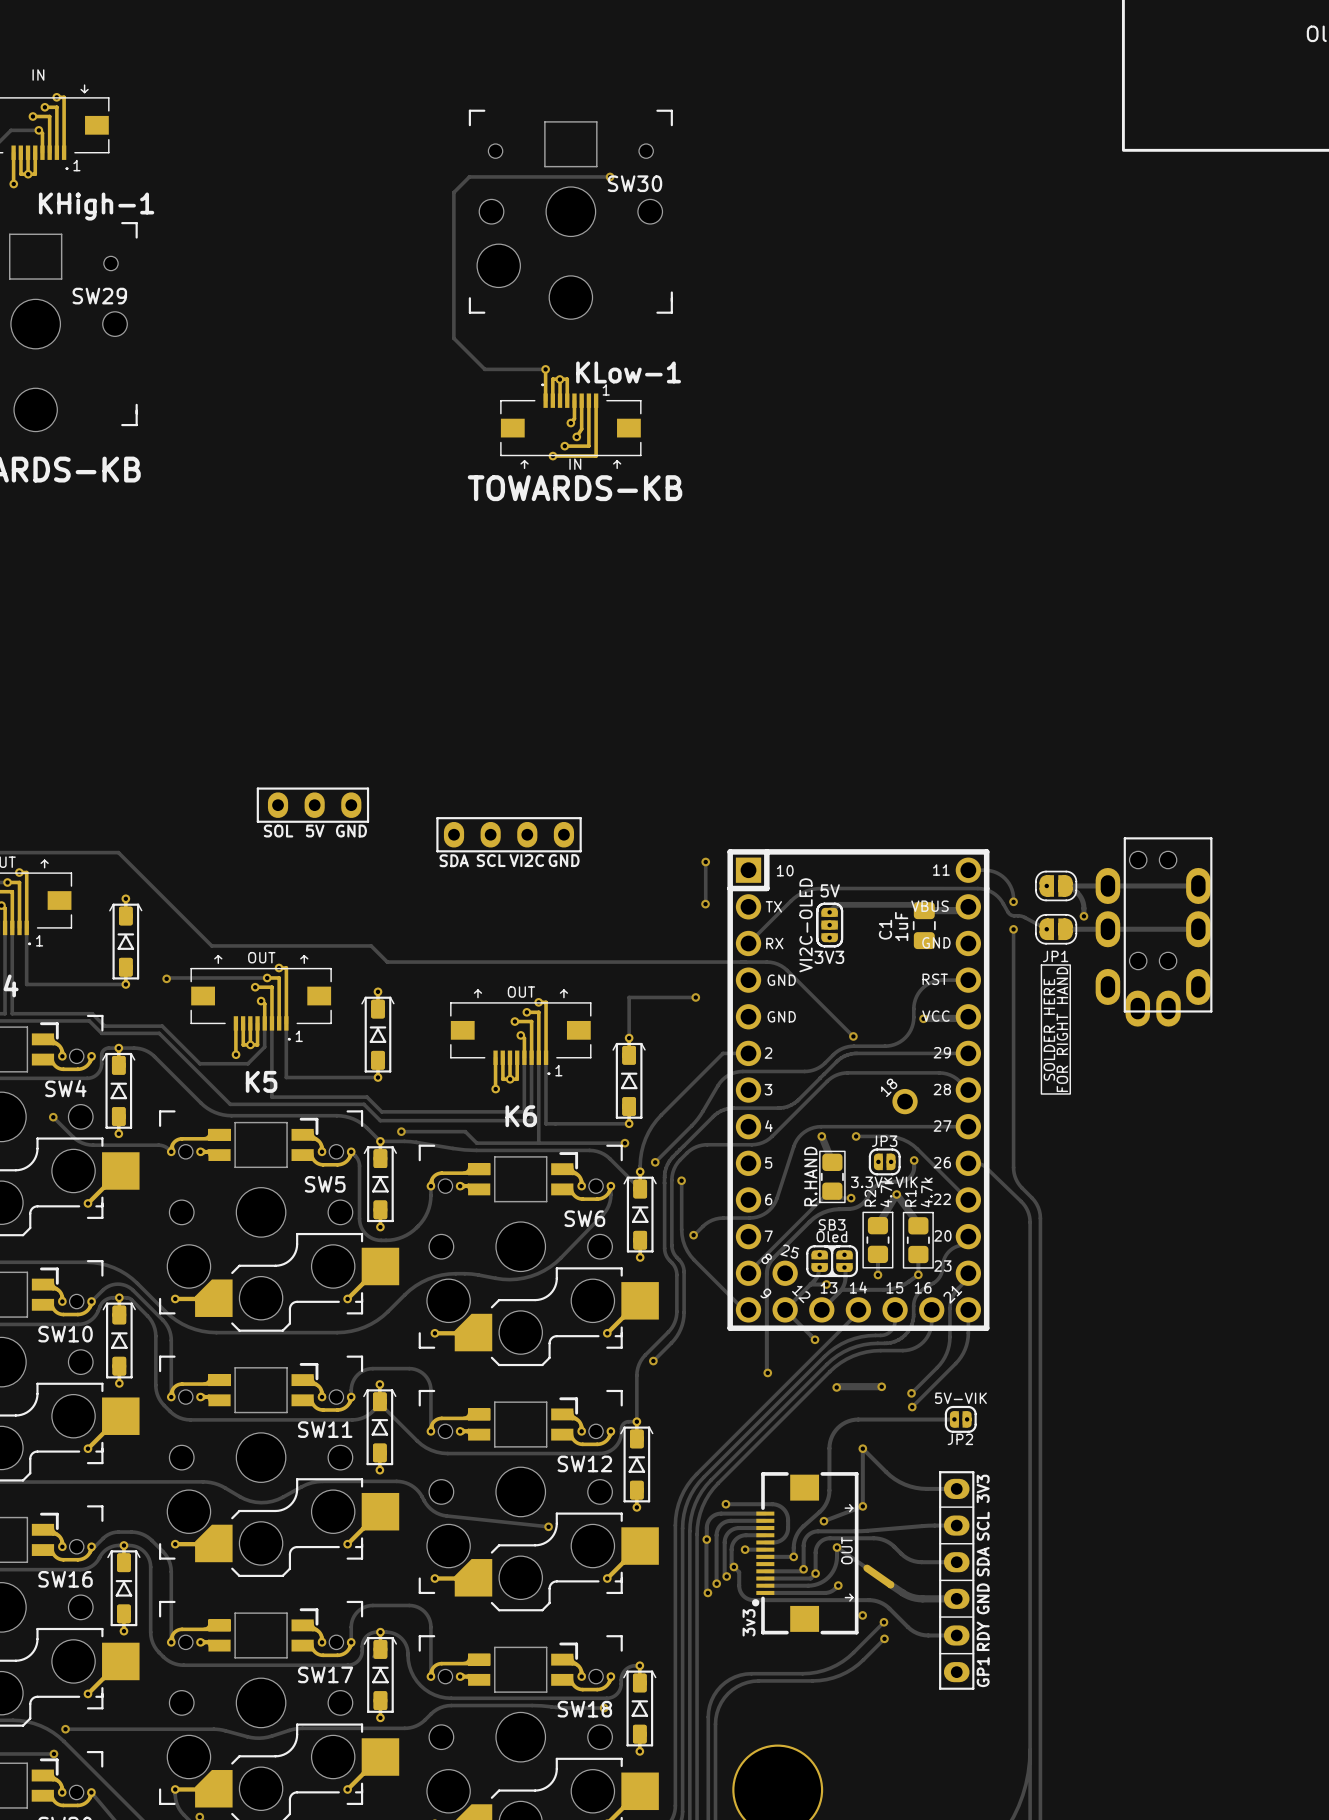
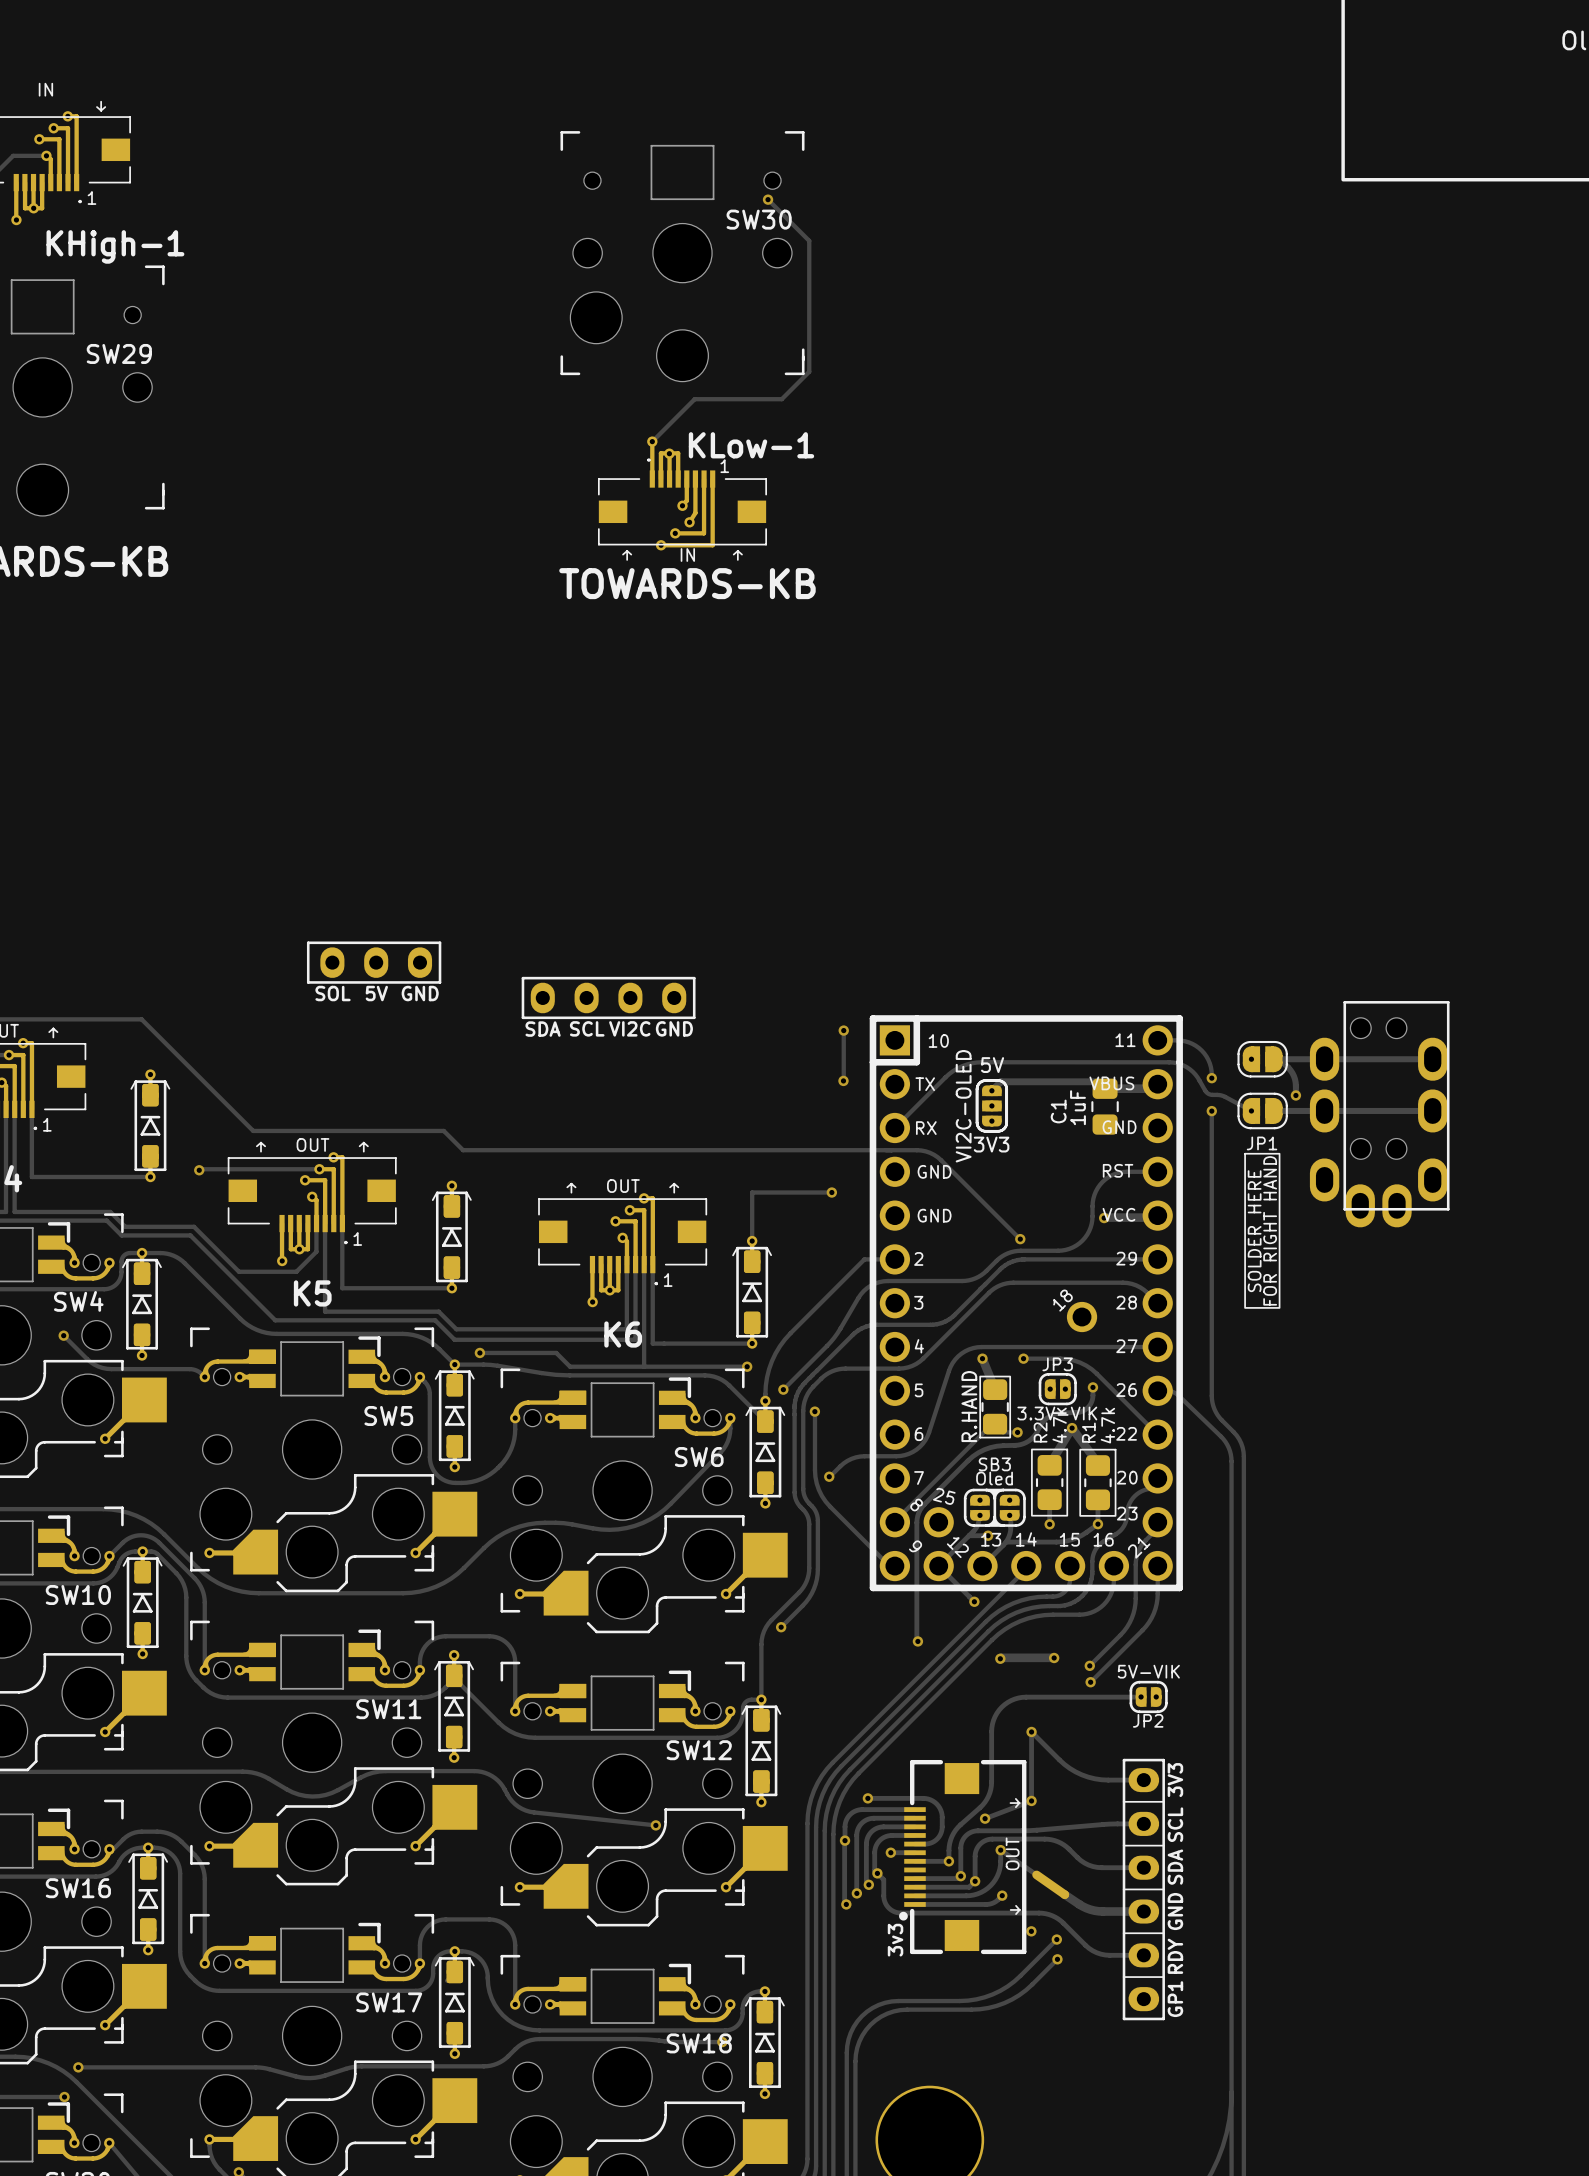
track: (610, 176) (469, 176) (453, 192) (453, 338) (484, 369) (545, 369) -> (768, 199) (809, 240) (809, 371) (781, 399) (694, 399) (652, 441)
via position: (610, 176) -> (768, 199)

